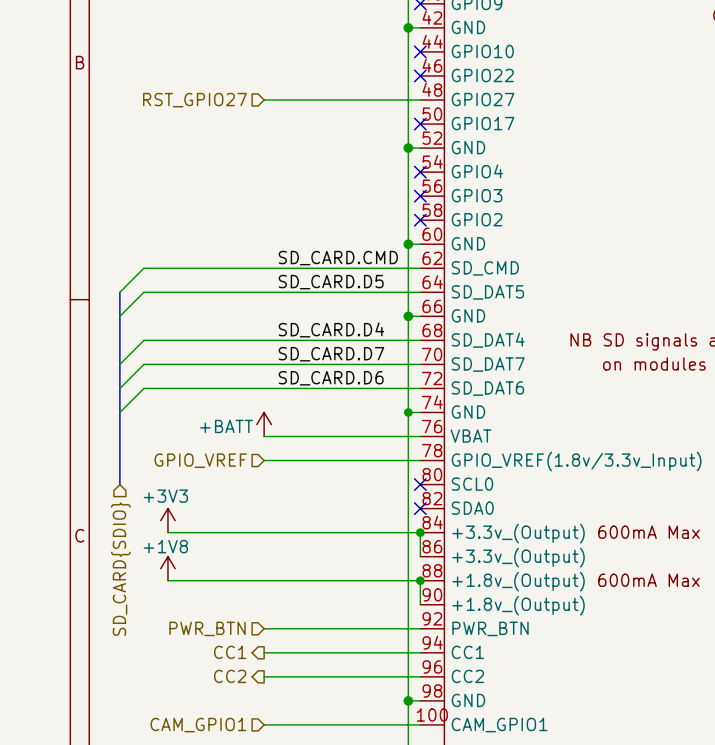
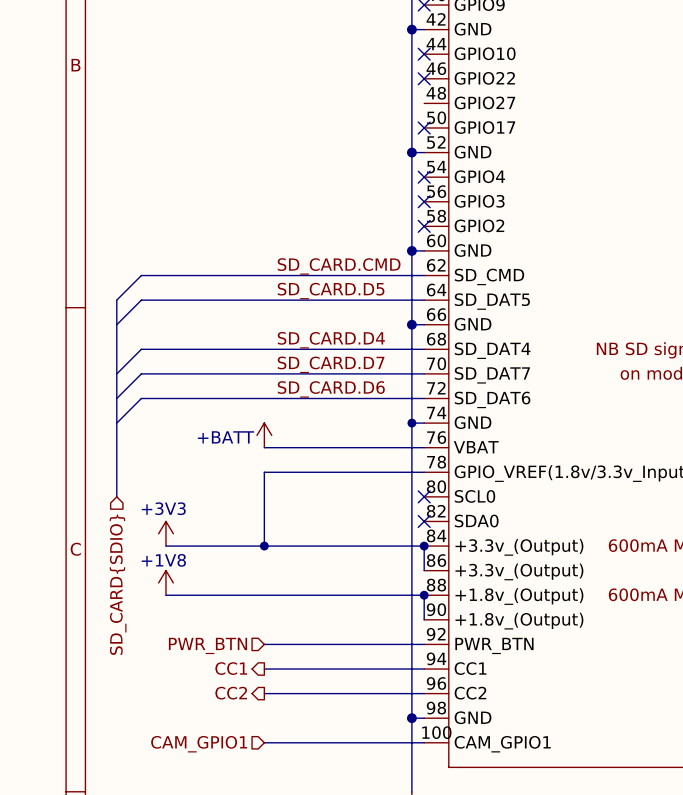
hierarchical label: RST_GPIO27 (194, 100) -> none
wire: (264, 100) (420, 100) -> none
hierarchical label: GPIO_VREF (200, 460) -> none
wire: none -> (264, 472) (264, 546)
junction: none -> (264, 546)

